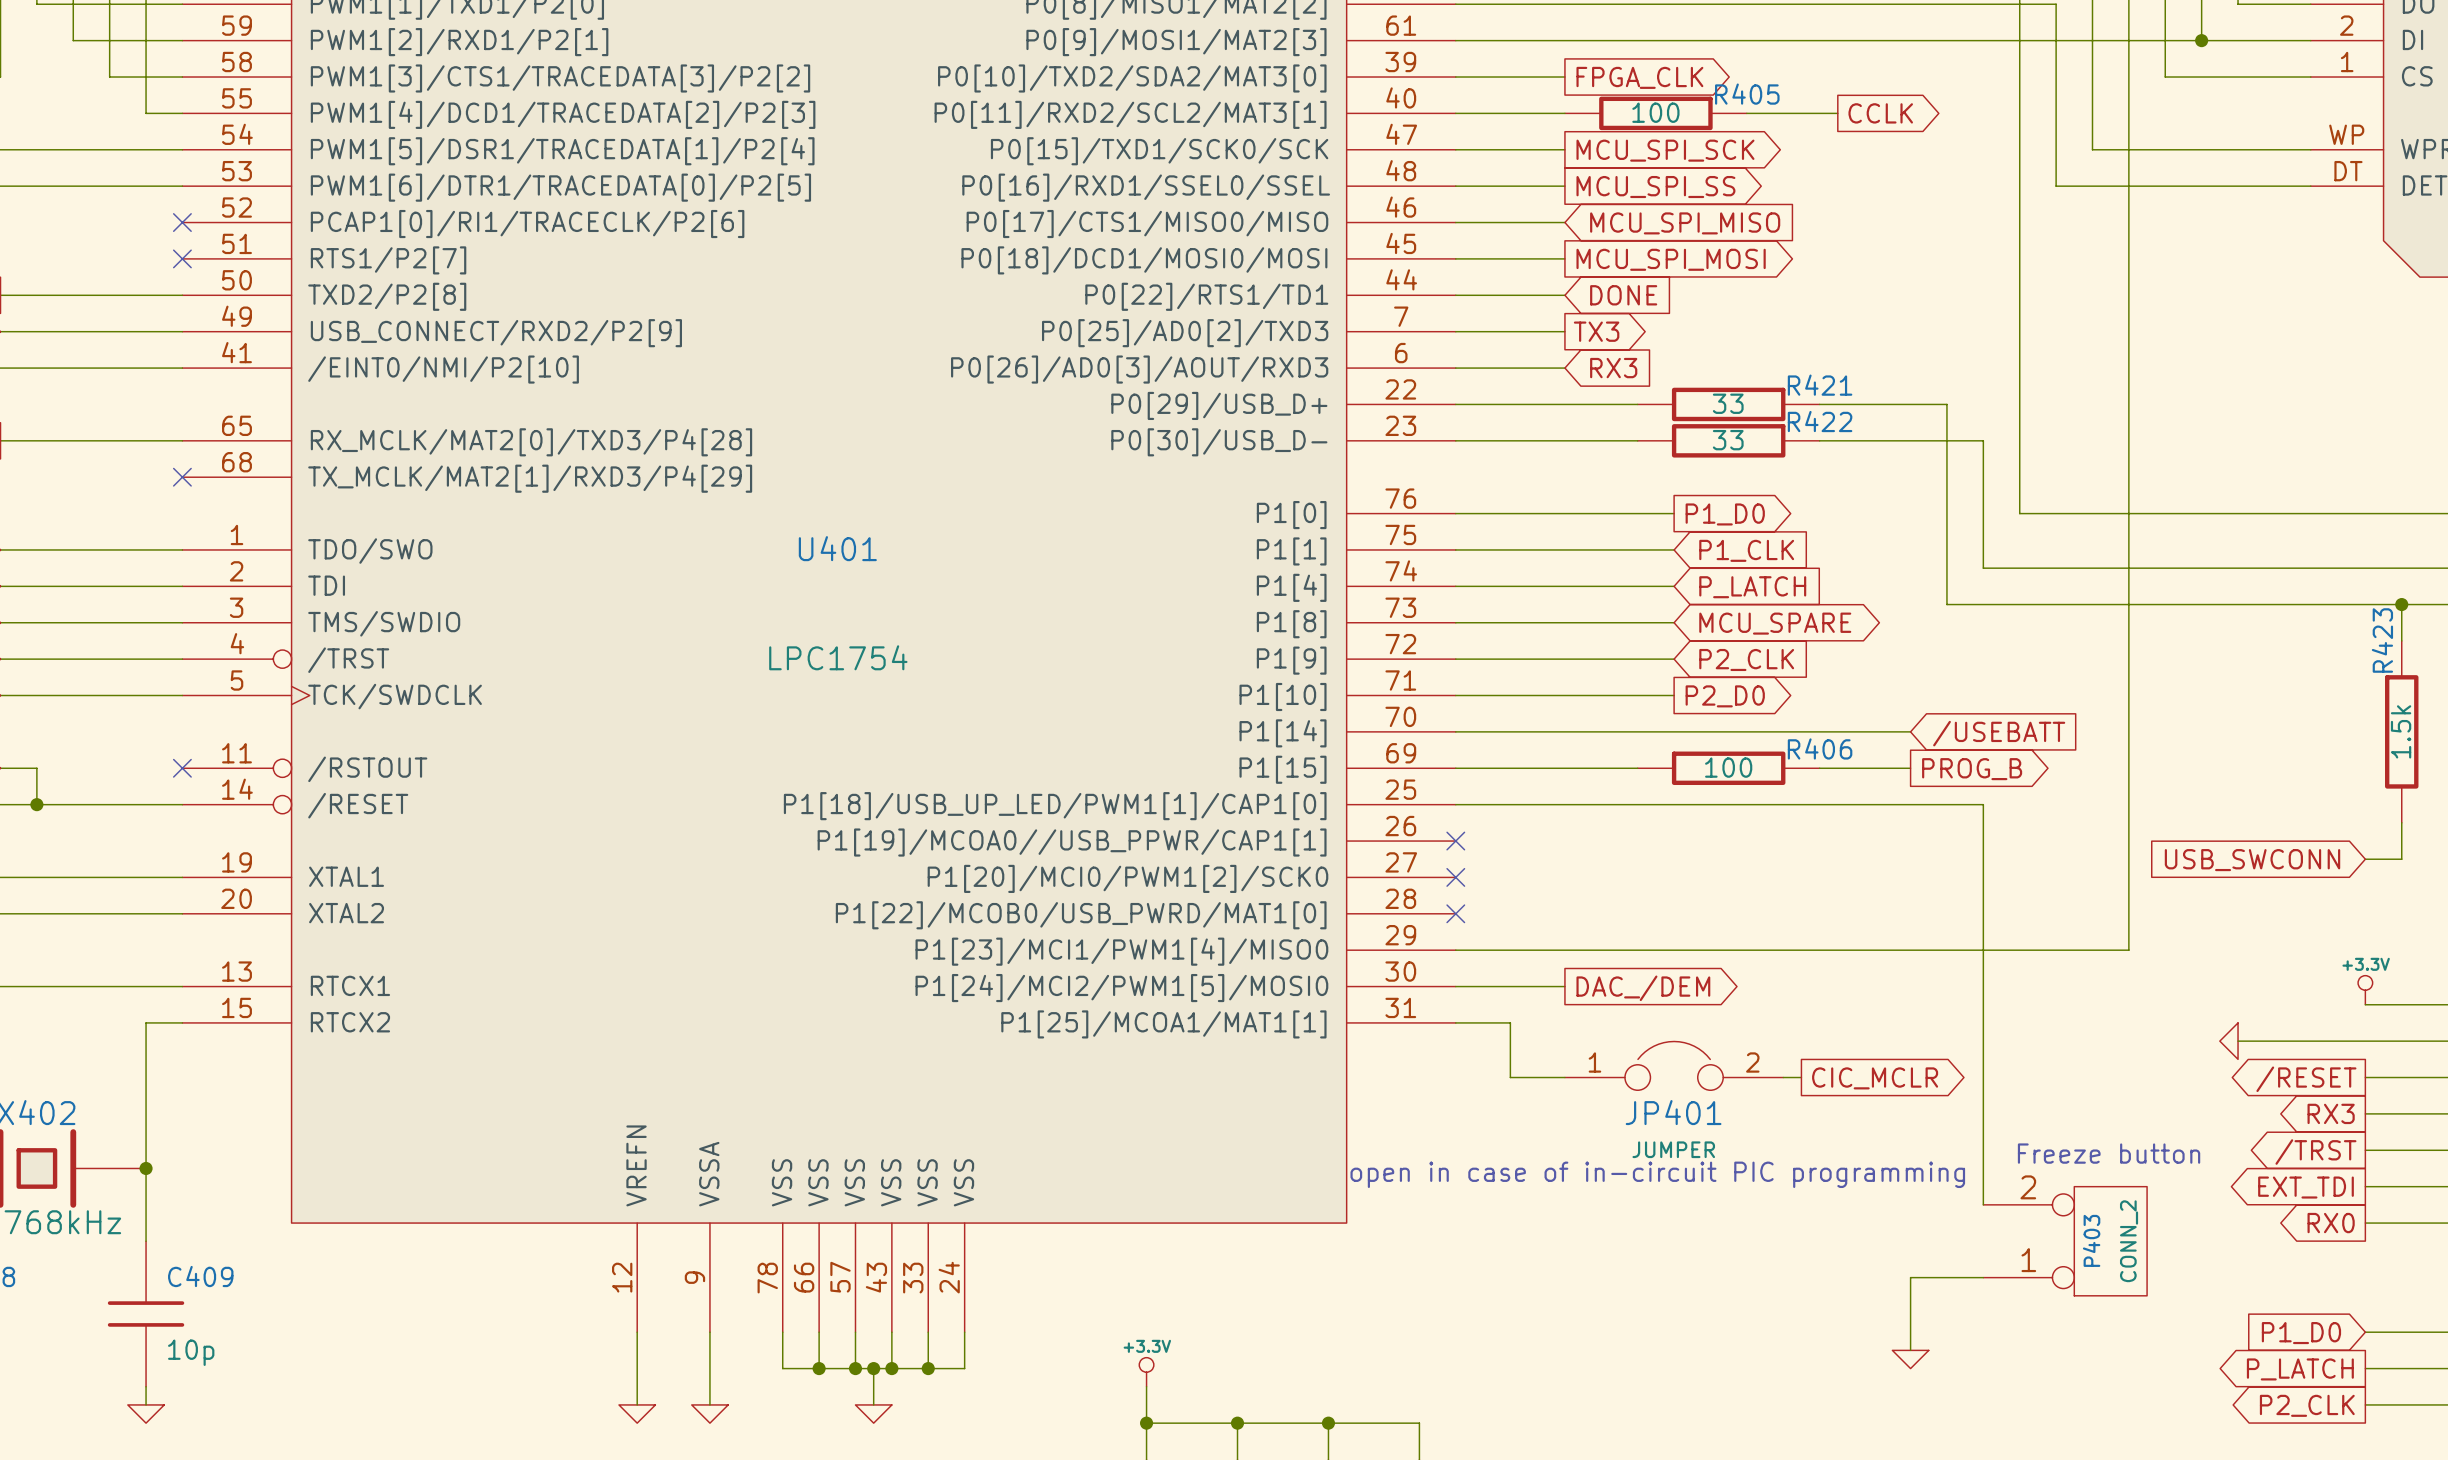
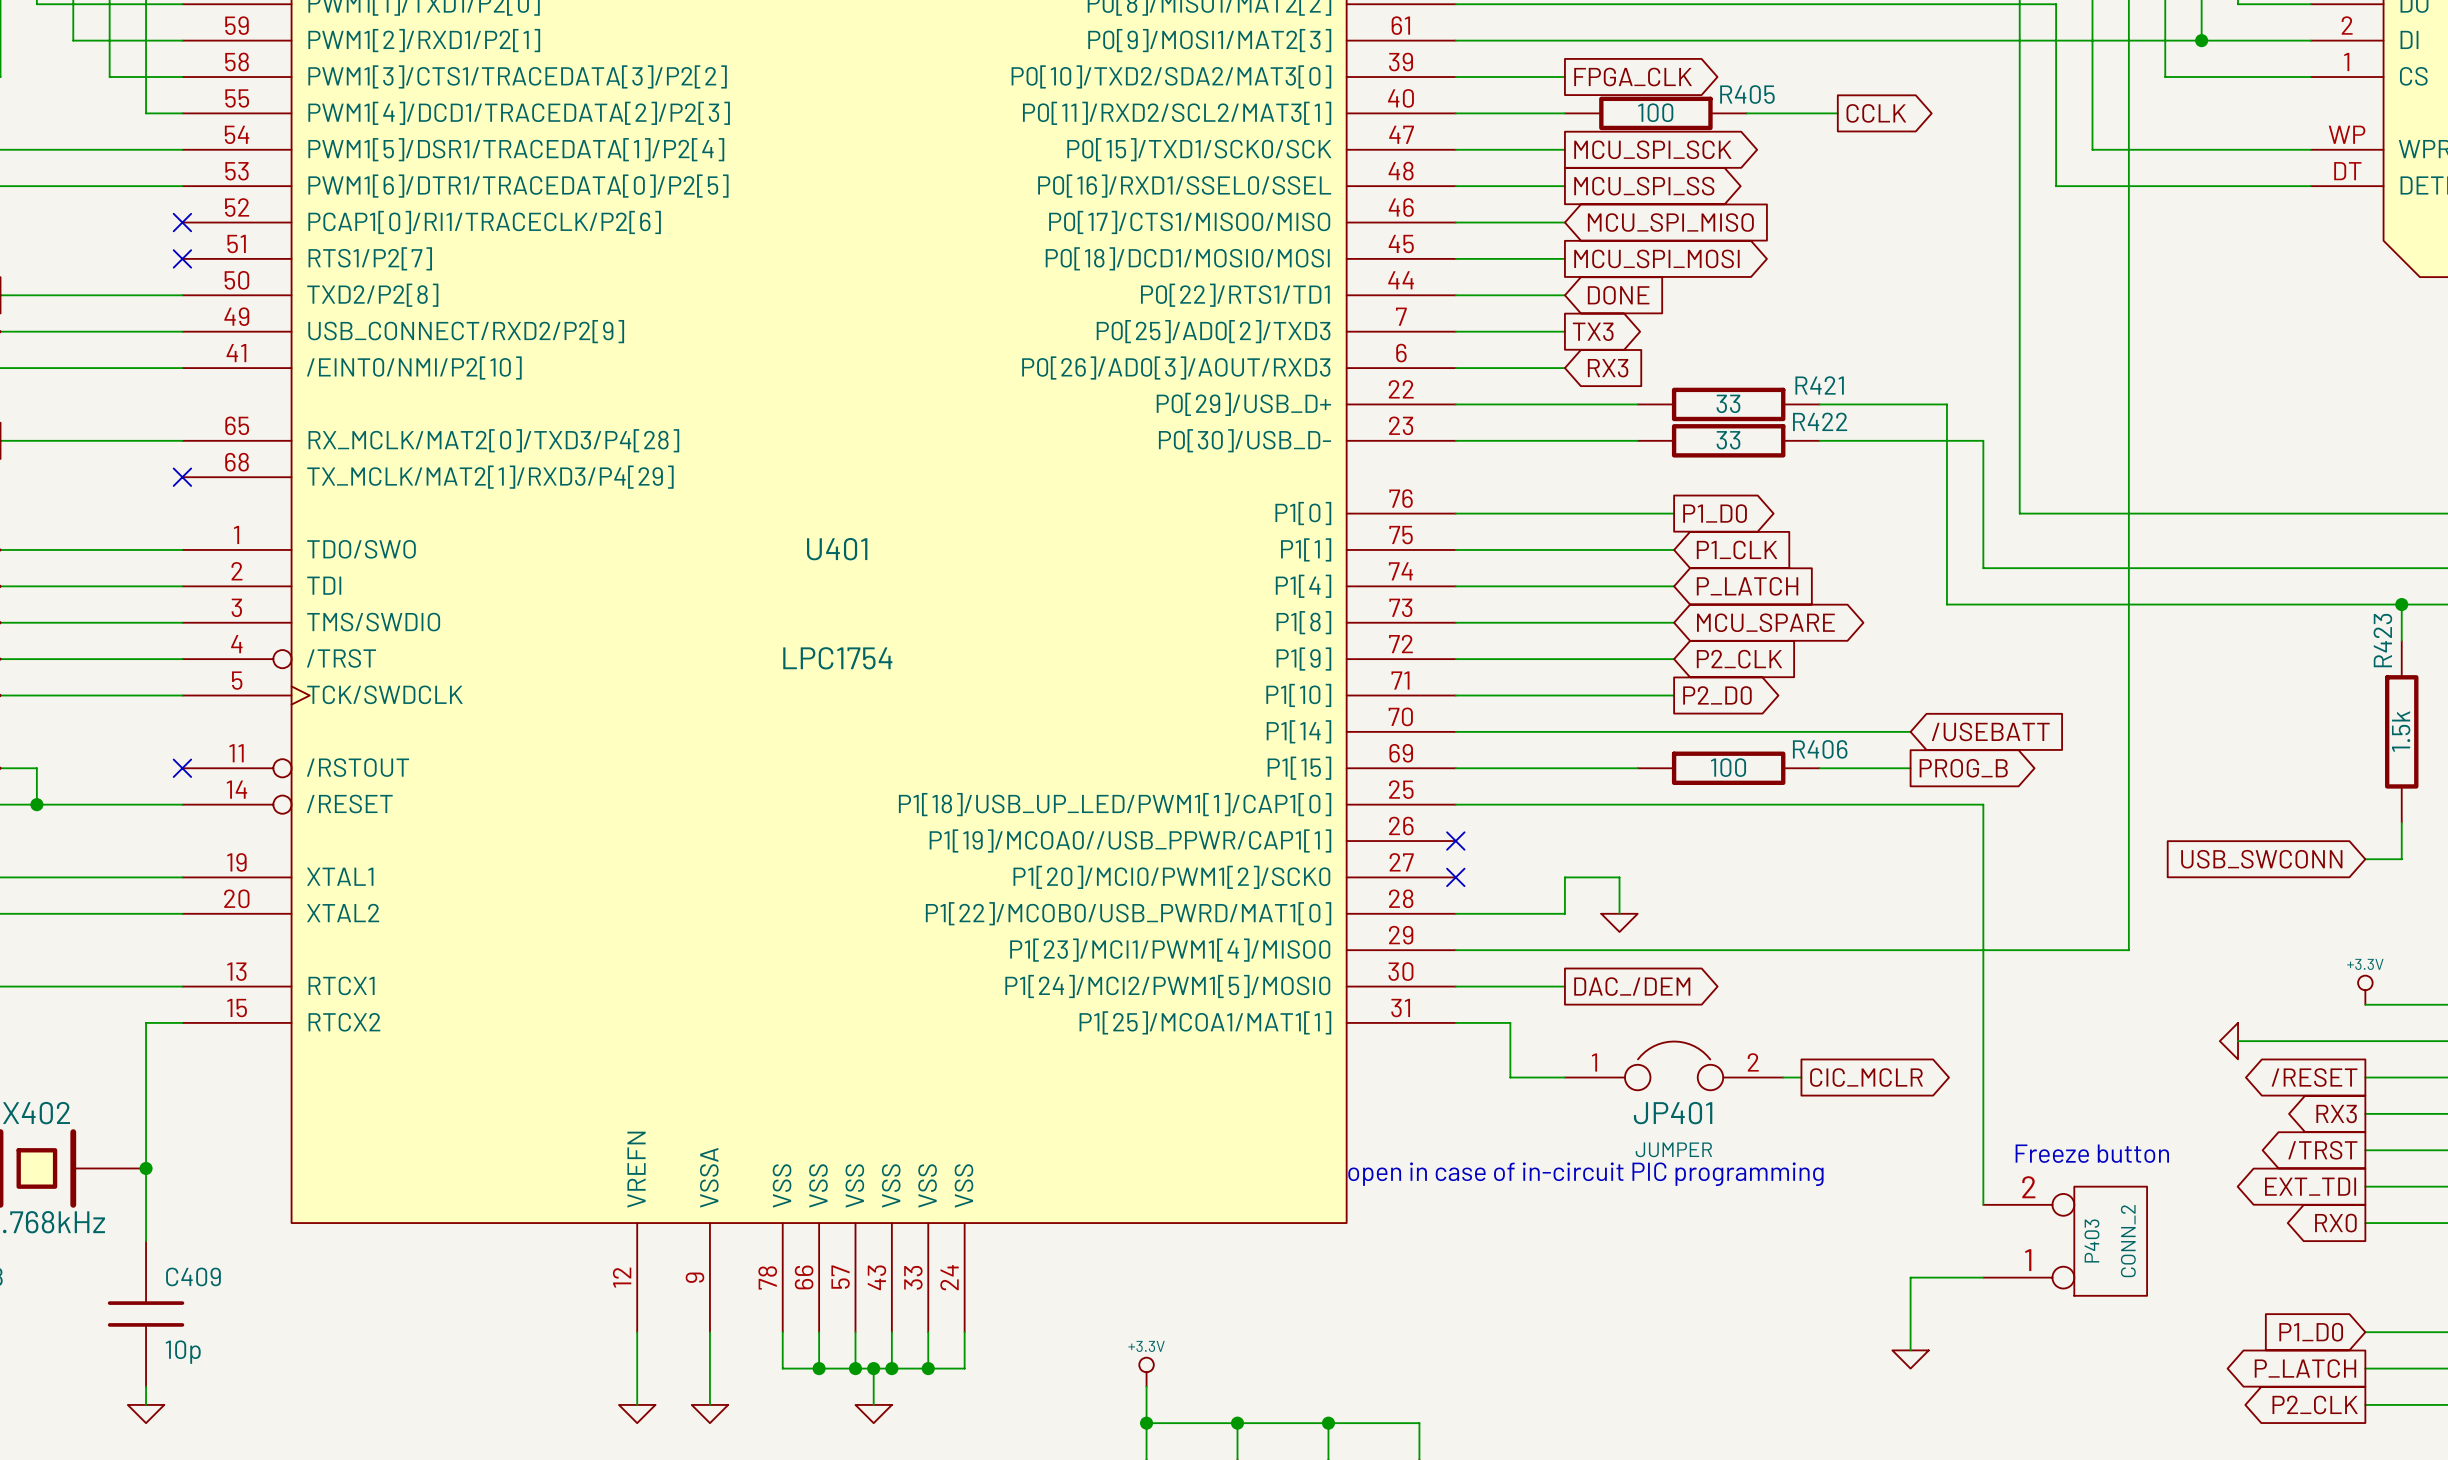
wire: none -> (1455, 913) (1564, 913) (1564, 877) (1619, 877) (1619, 913)
no-connect mark: (1455, 913) -> none
power symbol: none -> (1619, 922)

